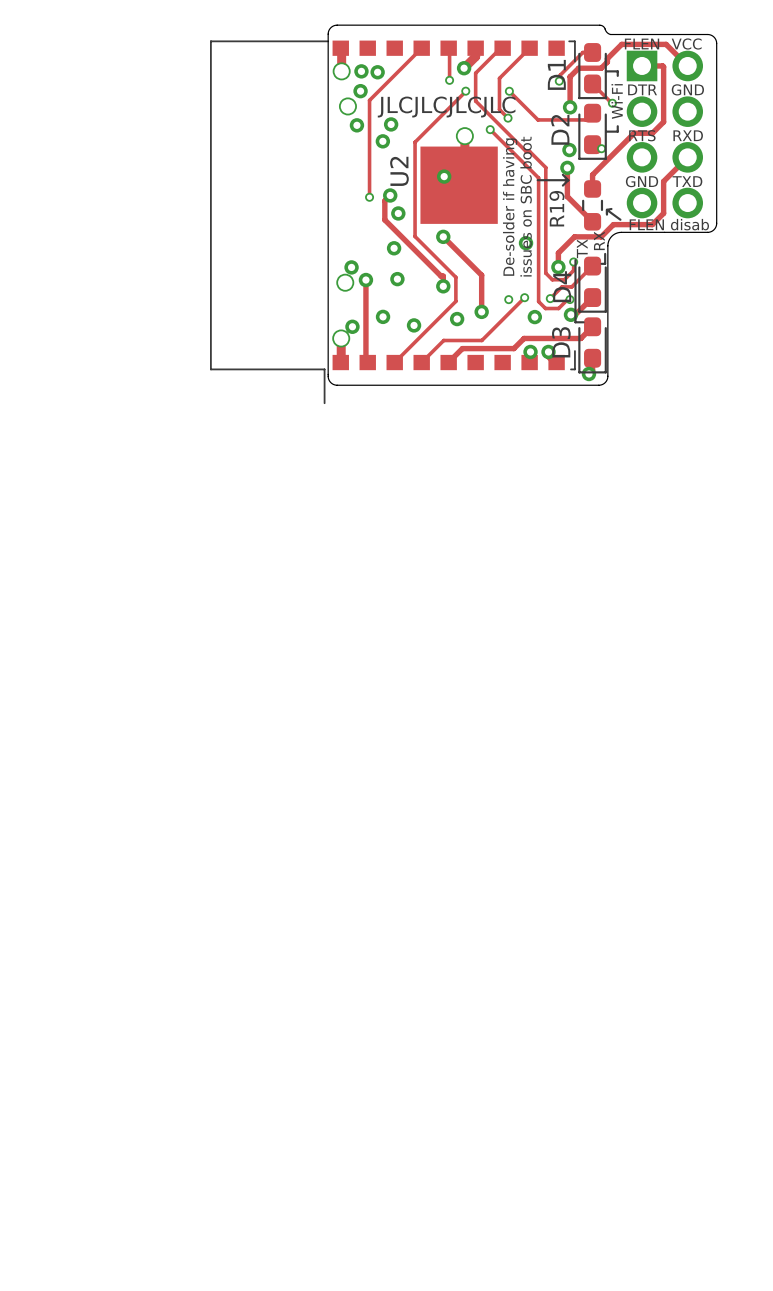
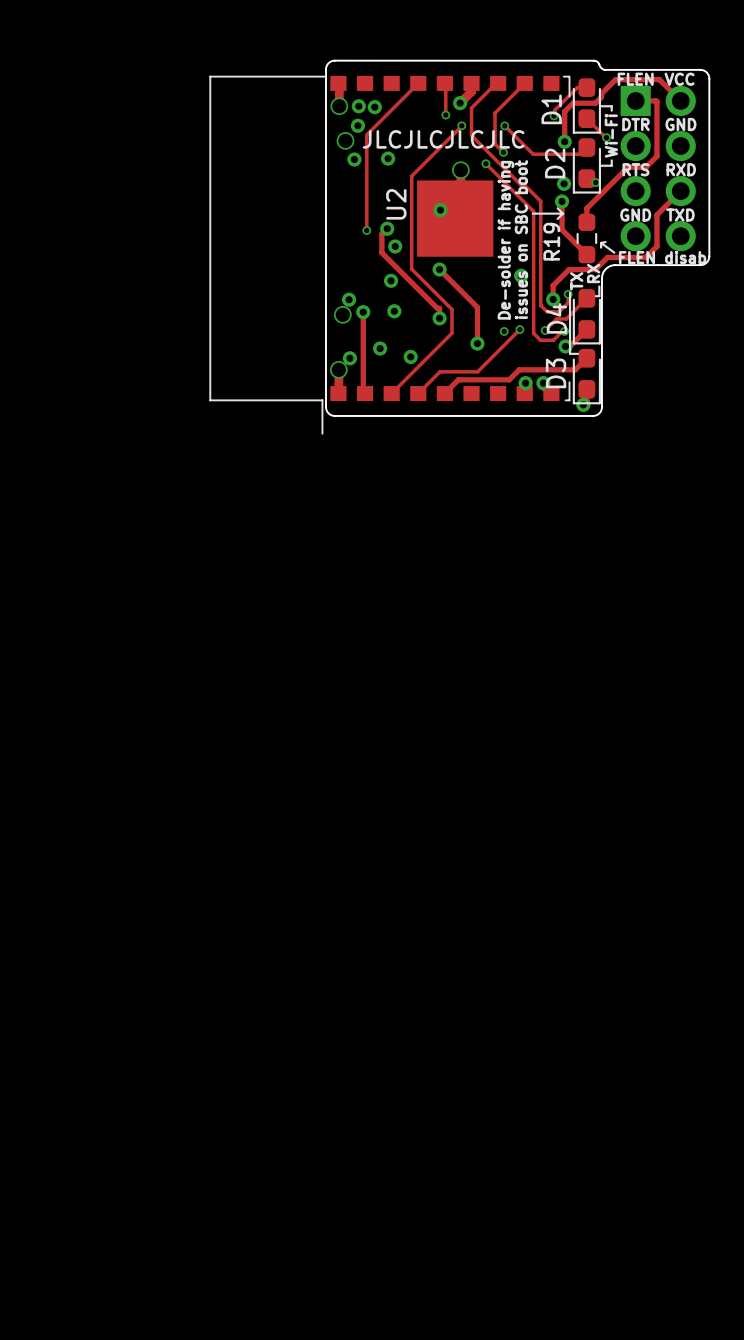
via: (382, 141) -> none
via: (534, 317) -> none
via: (457, 319) -> none

